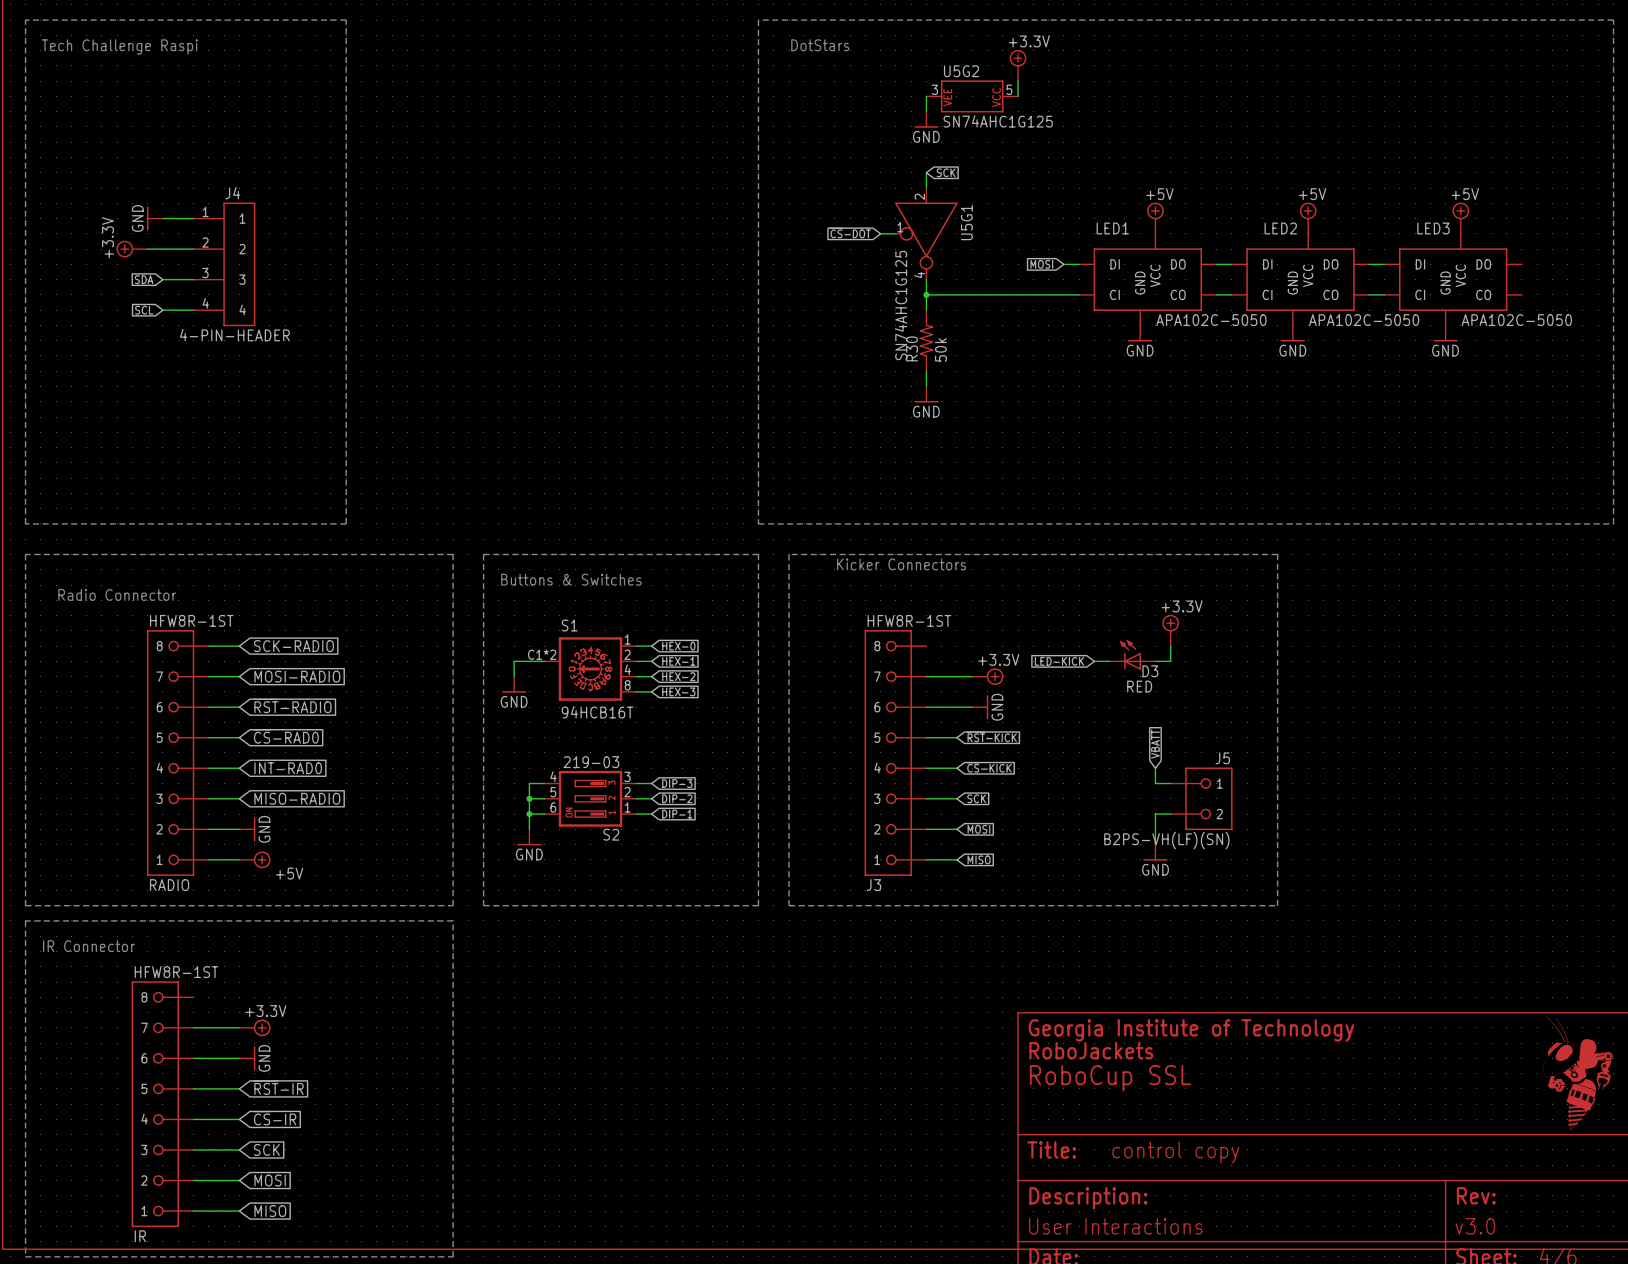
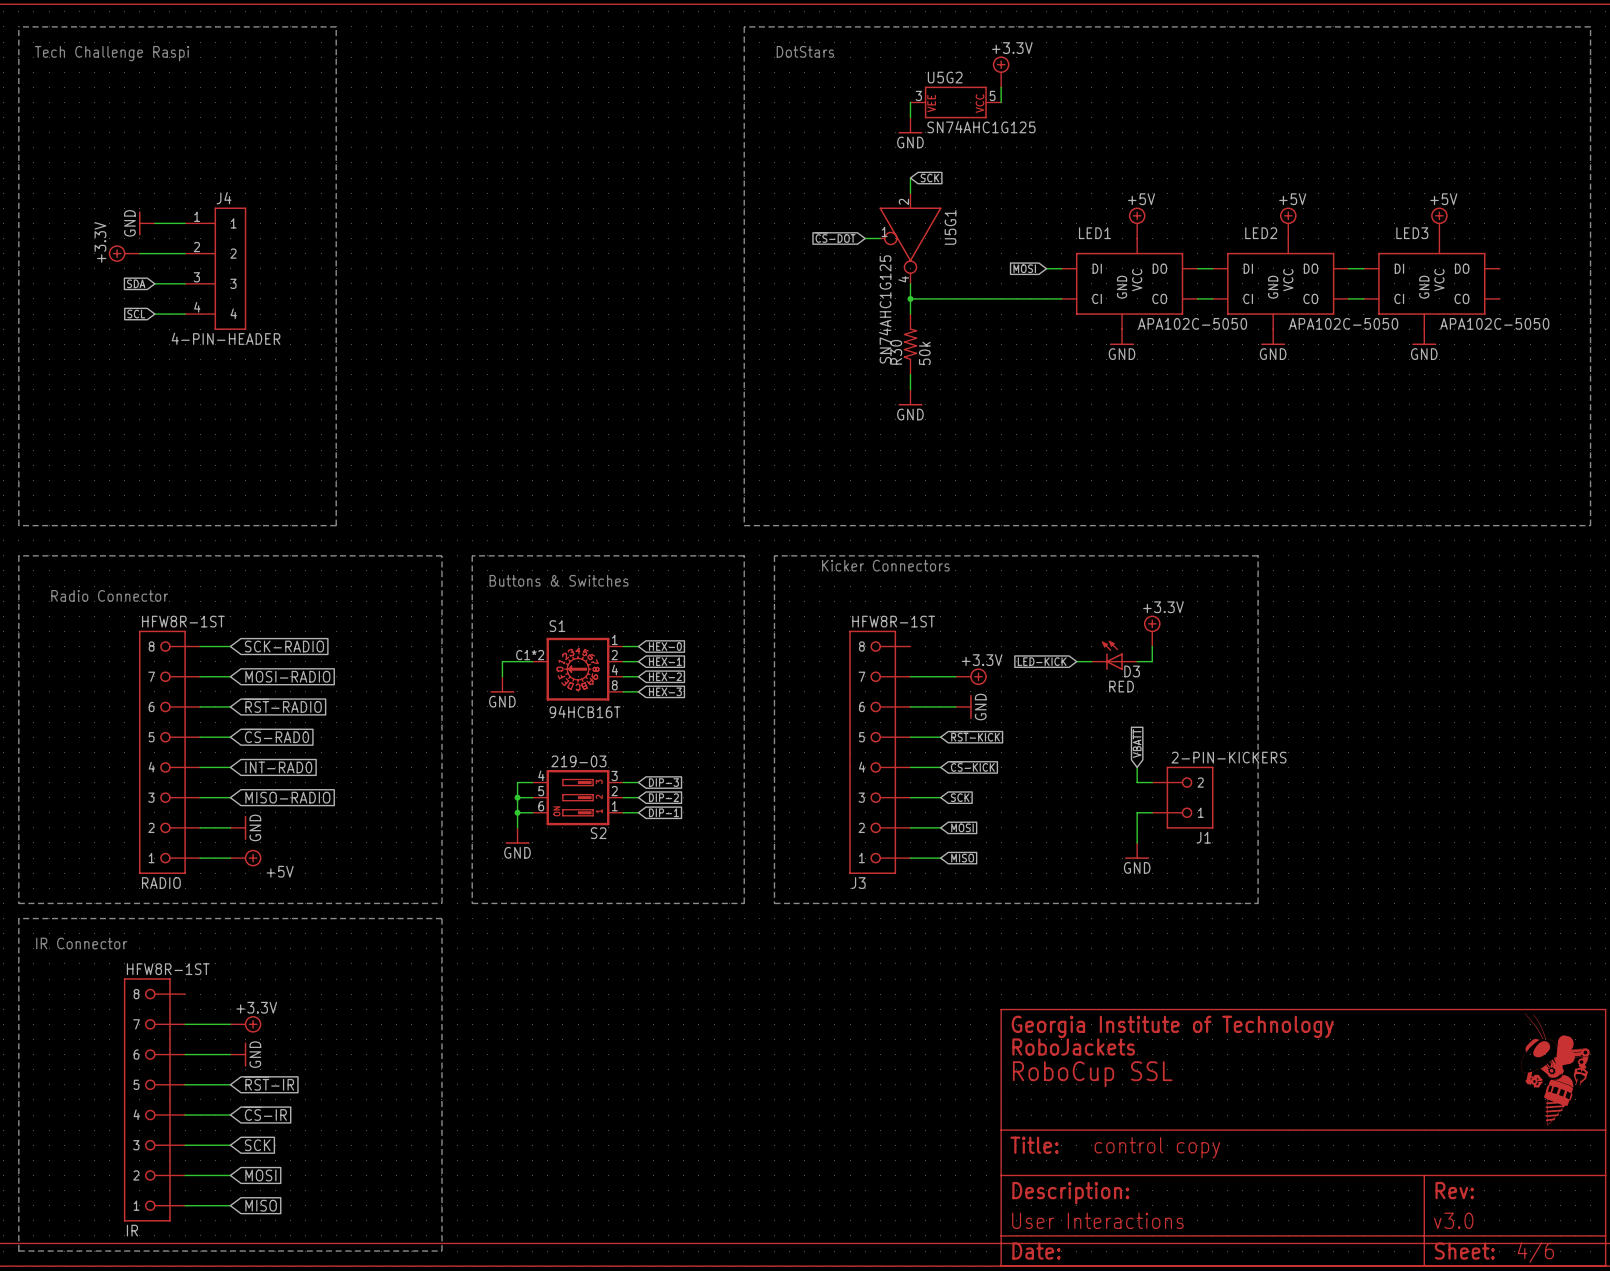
J5 name: J5 (1222, 758) -> J1 (1203, 837)
J5 flip: as is (1208, 798) -> up-down (1190, 797)
J5 value: B2PS-VH(LF)(SN) (1166, 840) -> 2-PIN-KICKERS (1229, 757)

